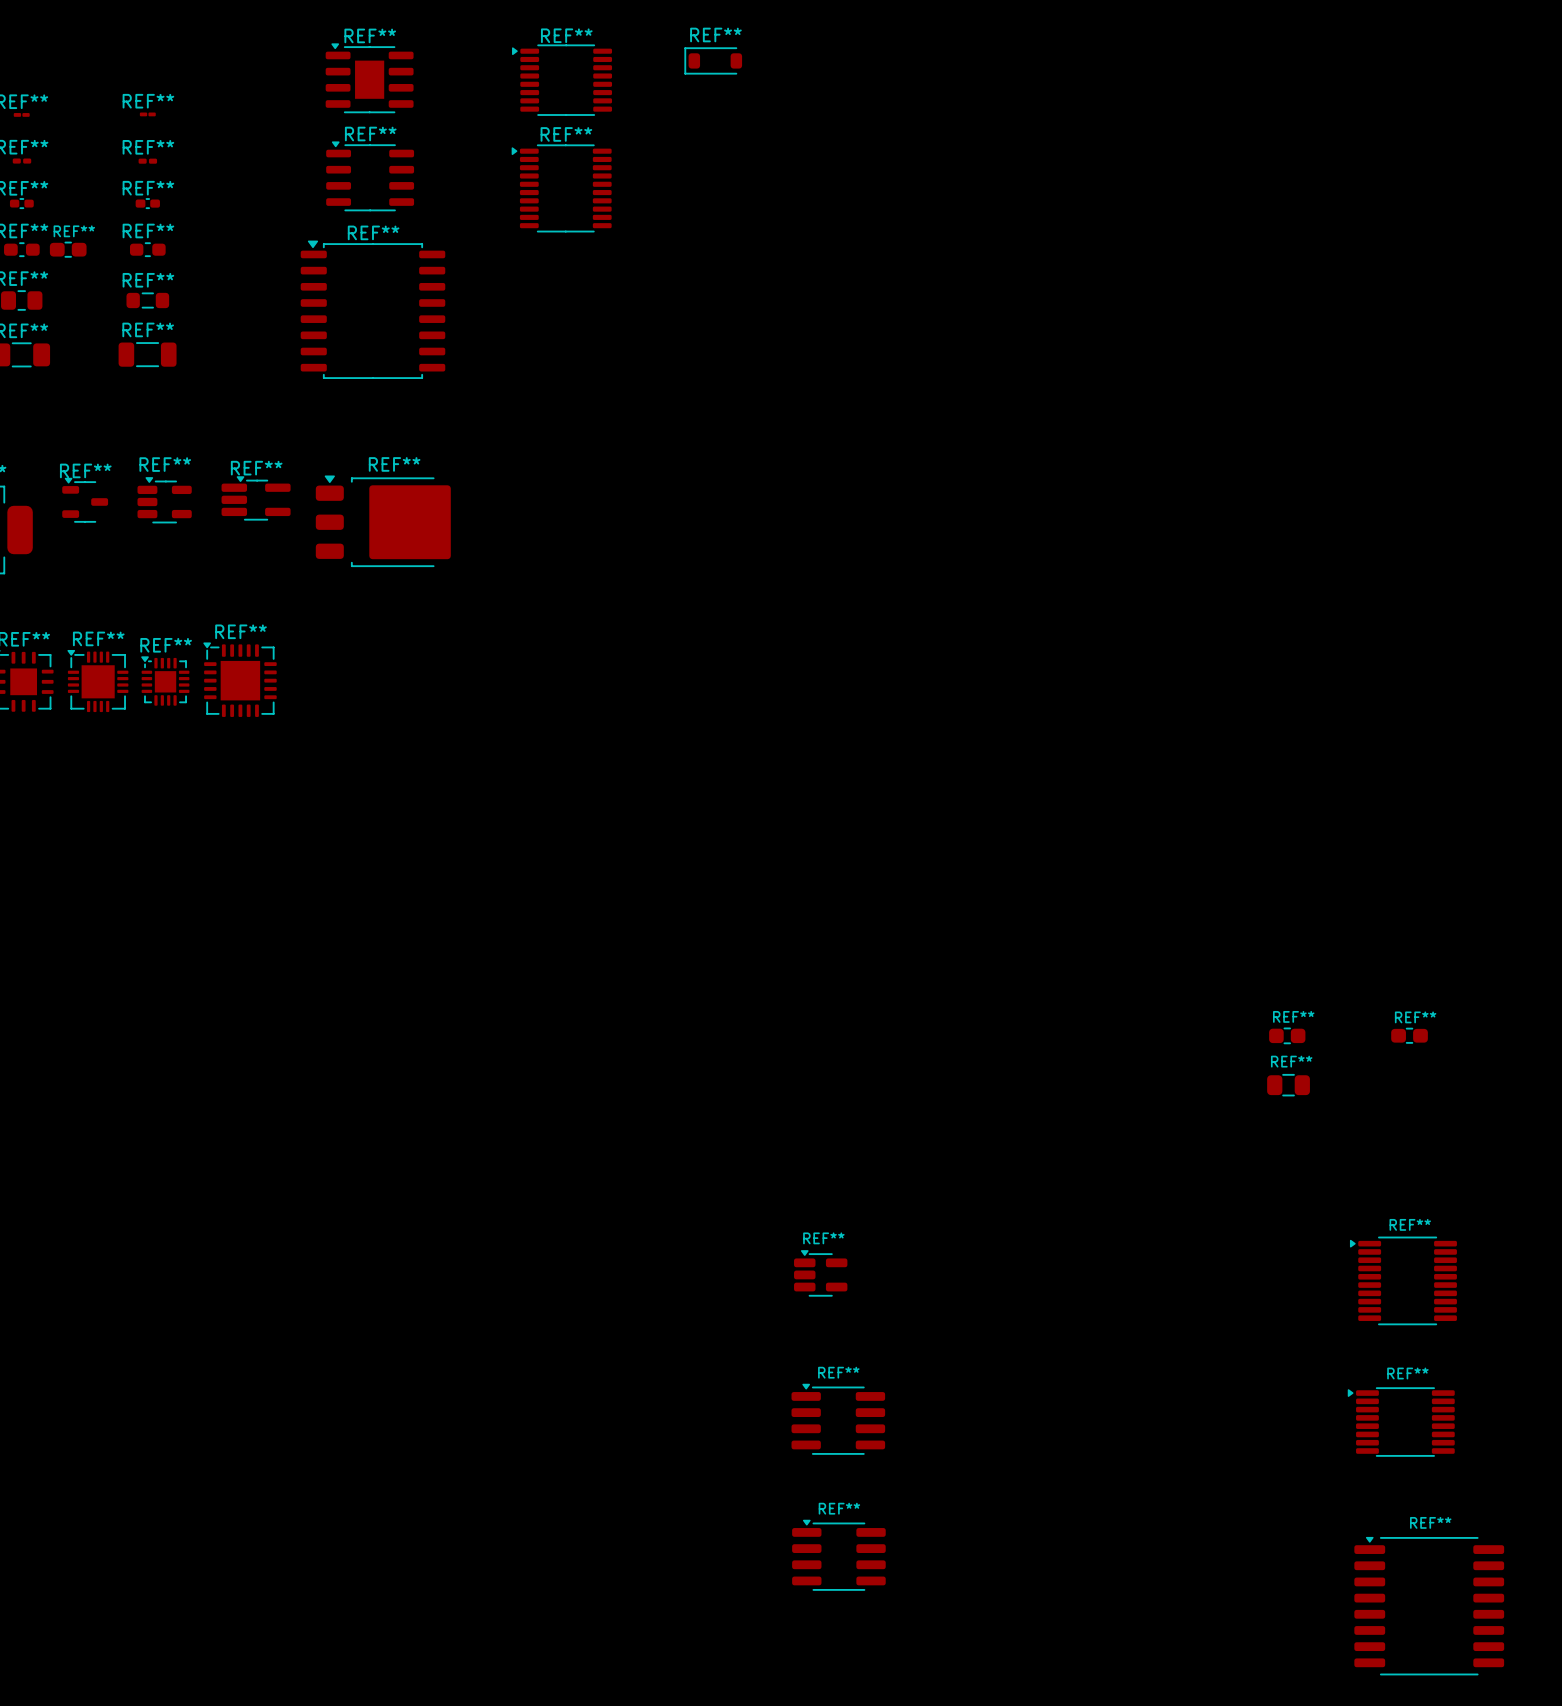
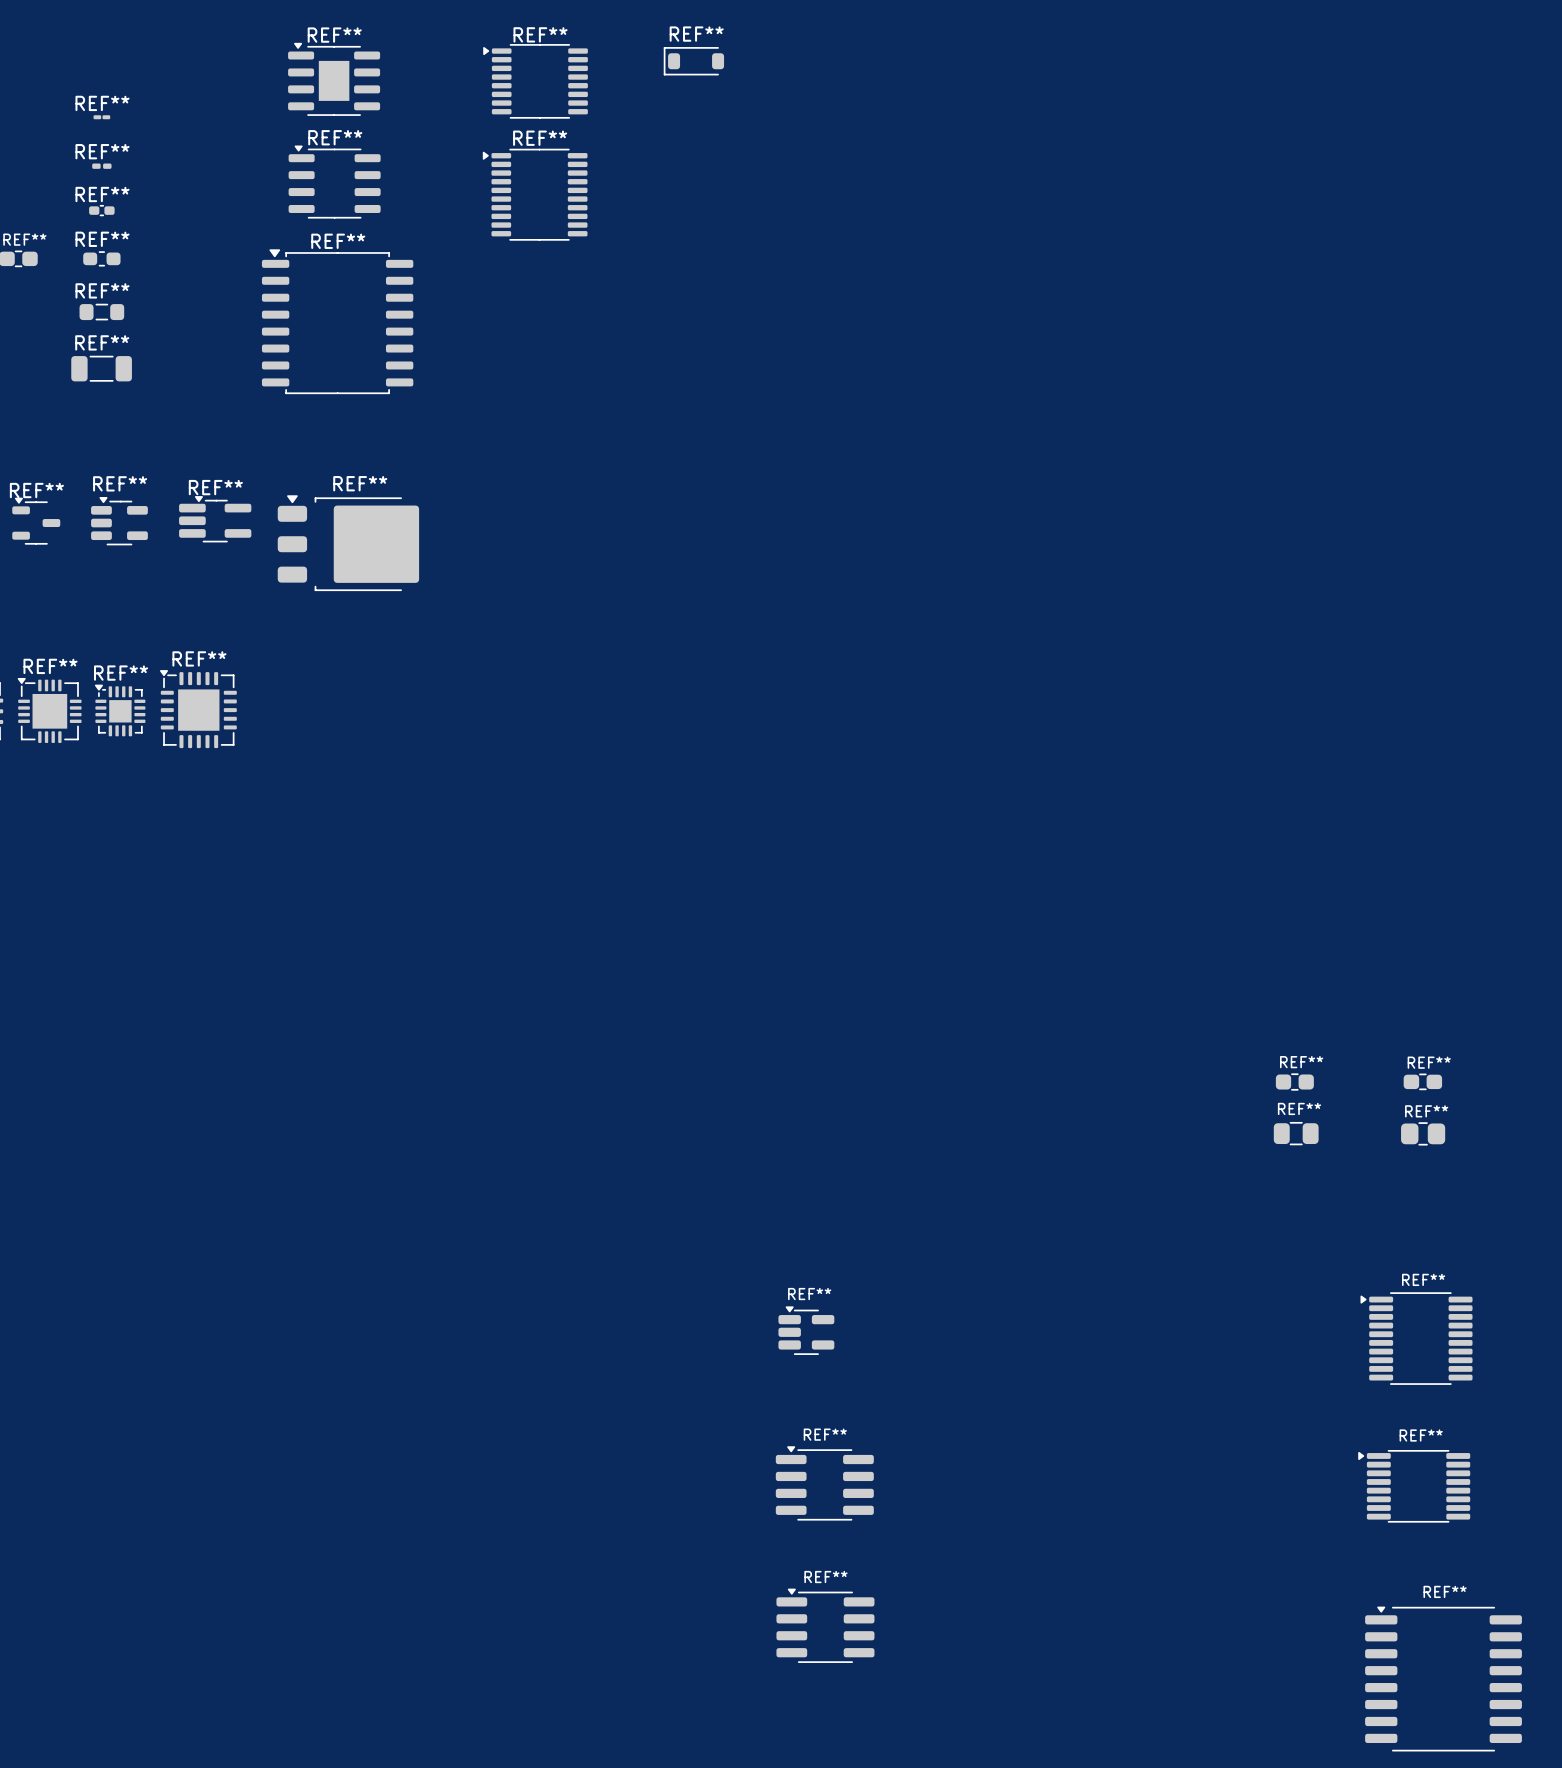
REF**: none -> (1423, 1133)

